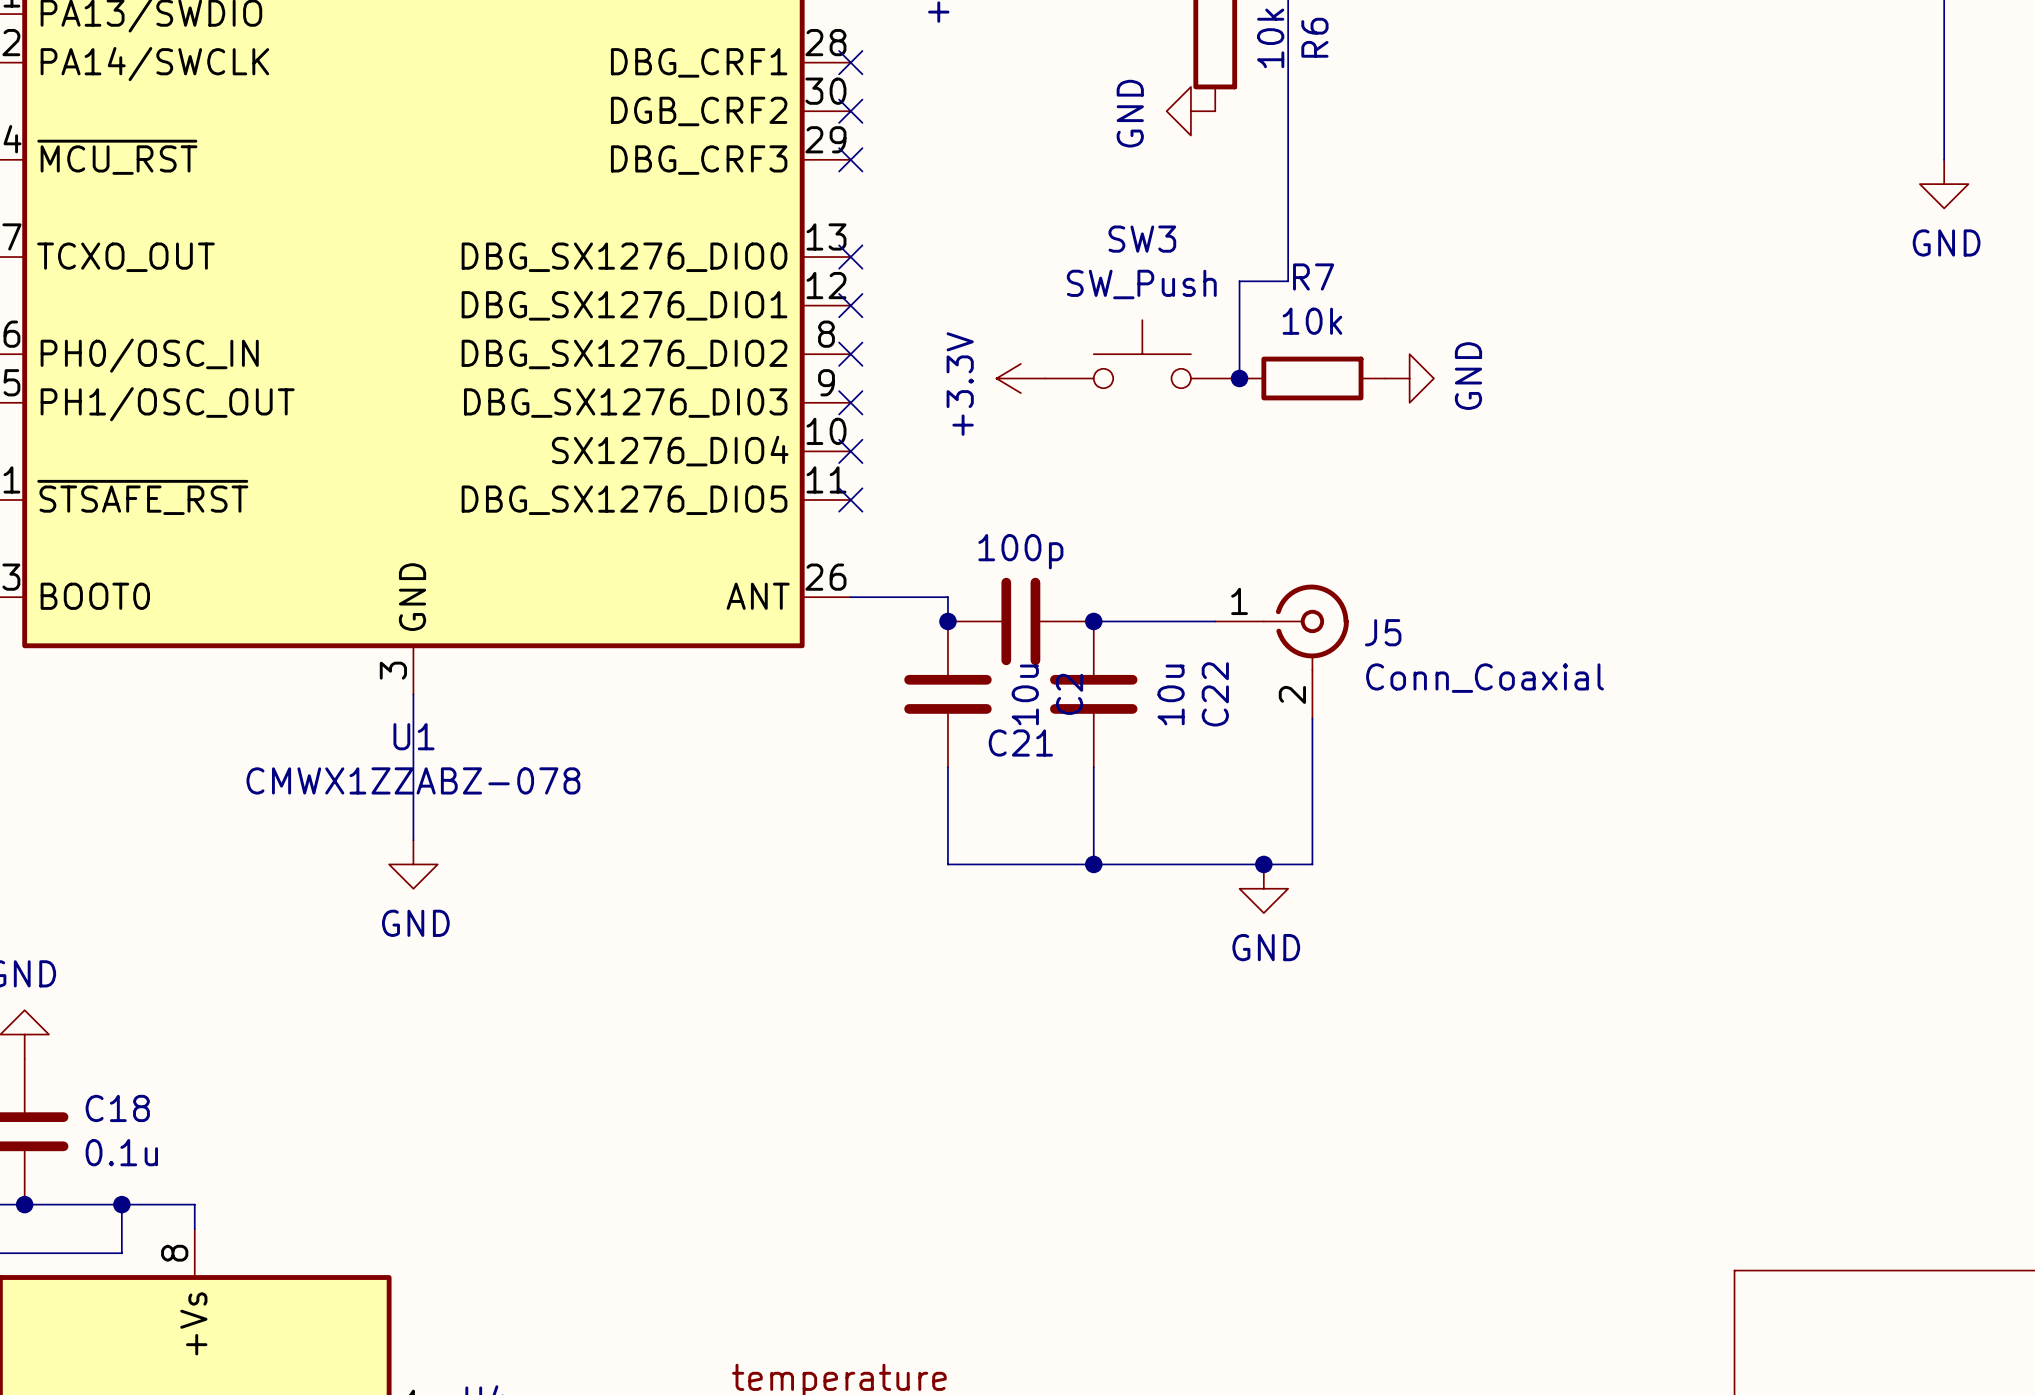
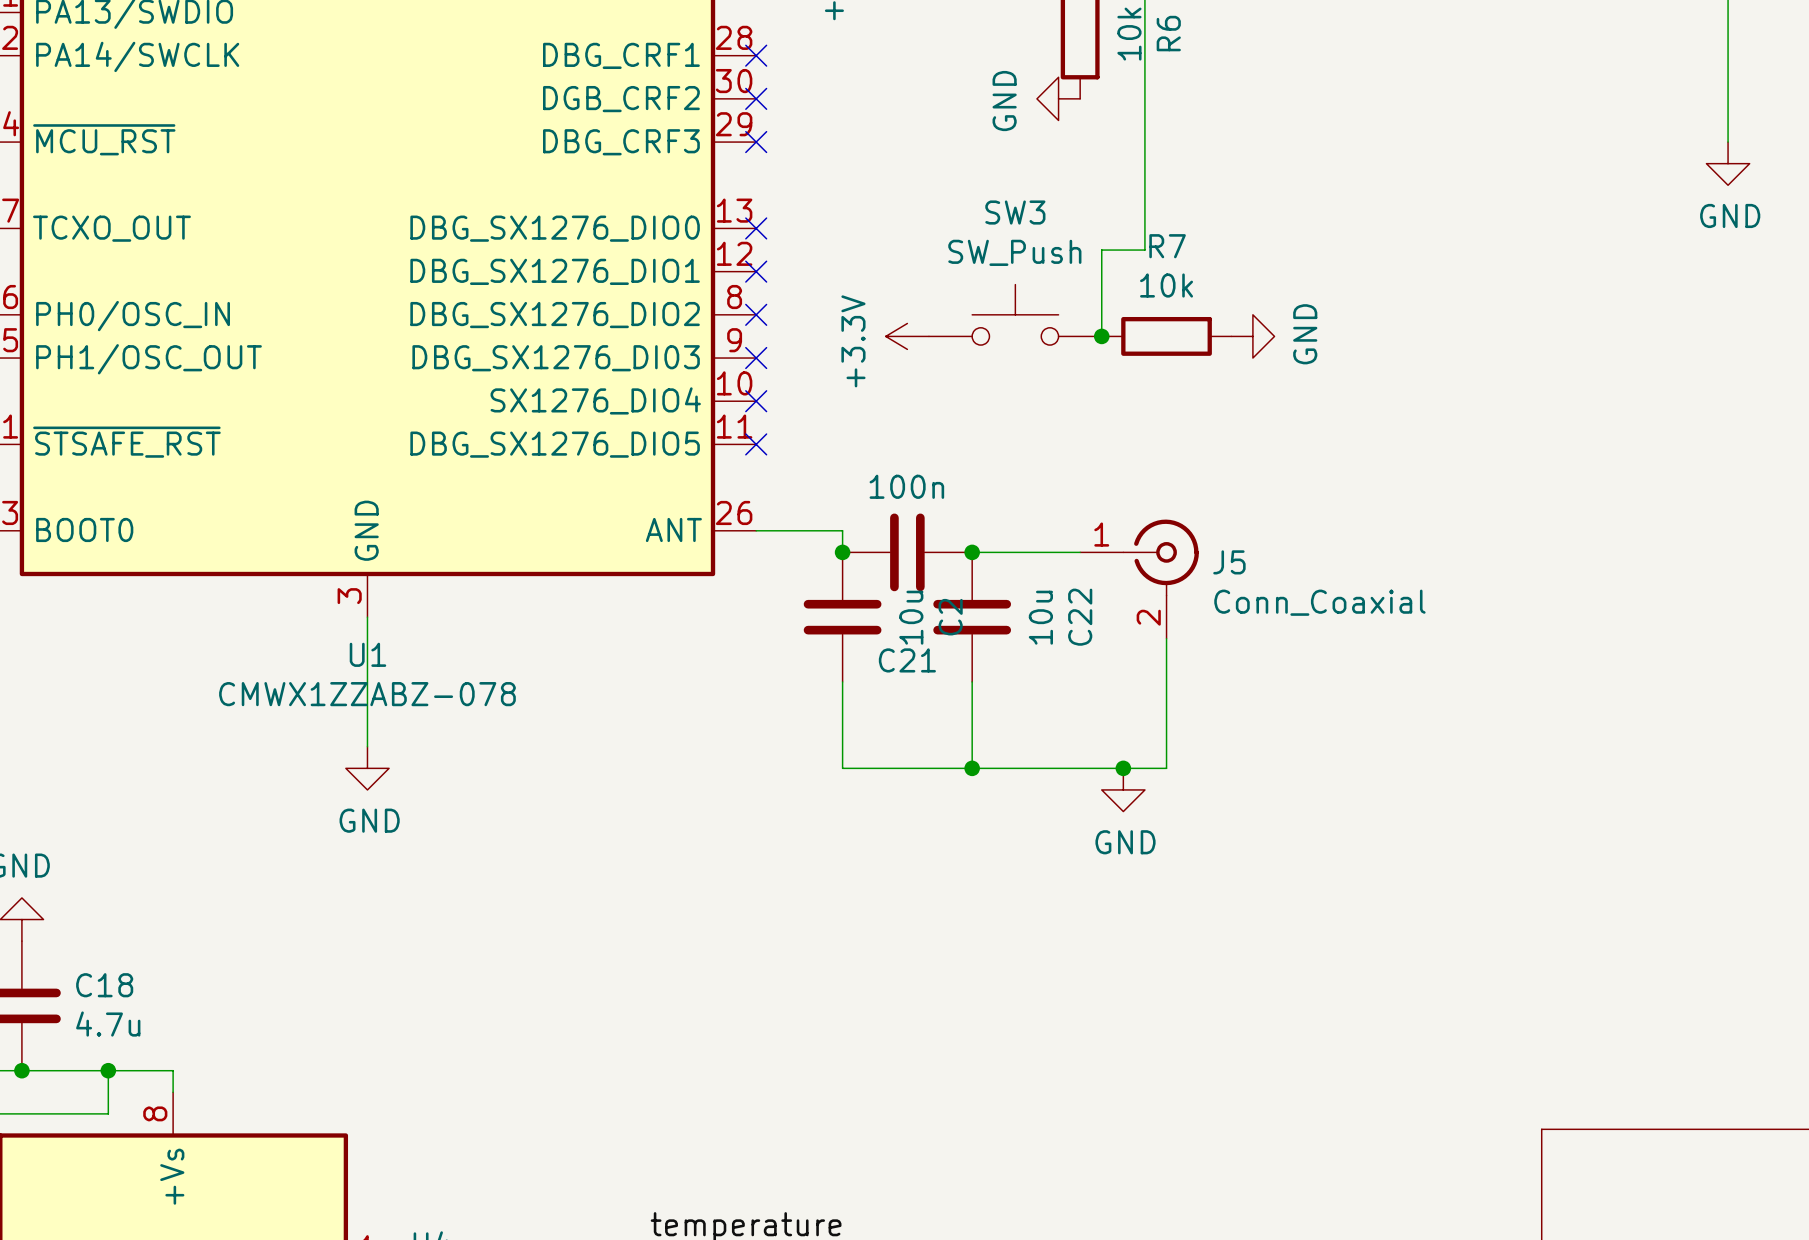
C21 value: 100p (1020, 551) -> 100n (906, 486)
C18 value: 0.1u (121, 1152) -> 4.7u (108, 1024)

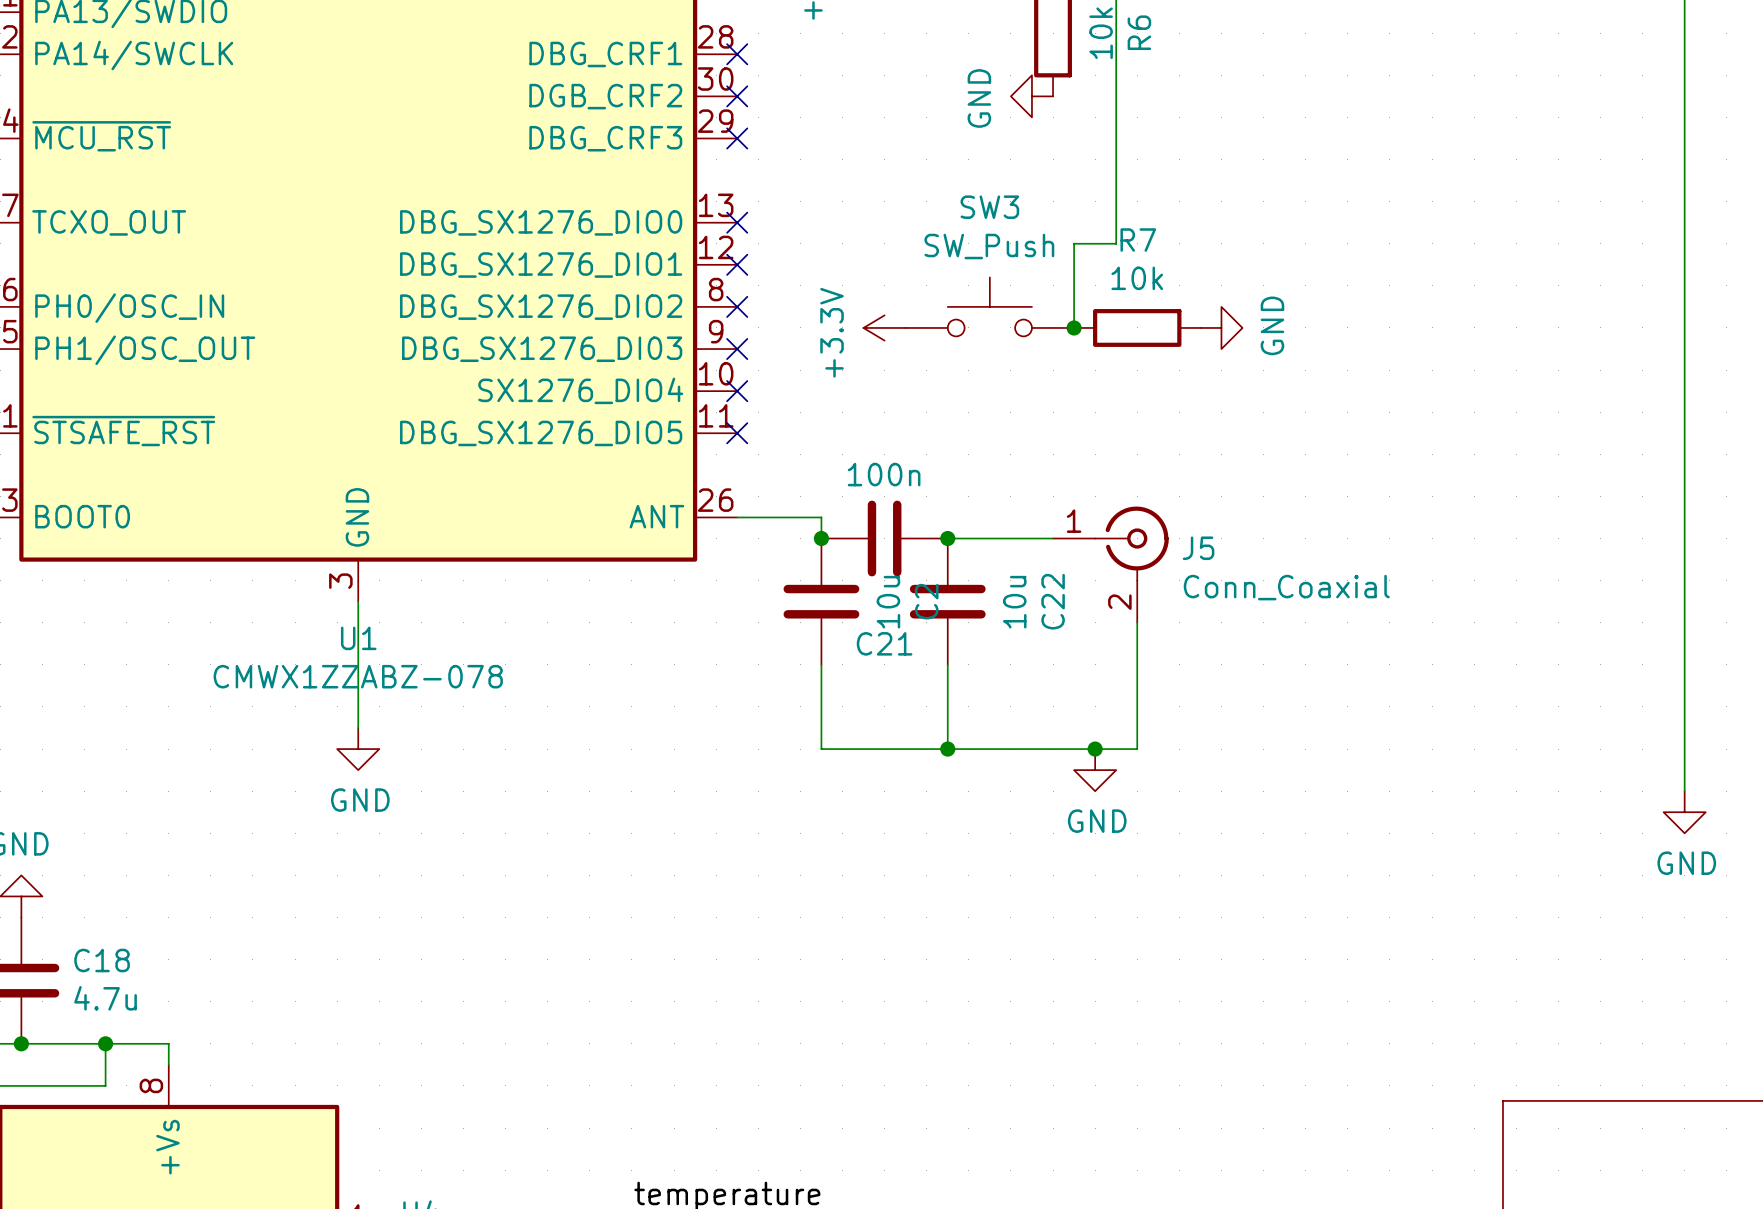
wire: none -> (1684, 138) (1684, 791)
power symbol: GND (1728, 163) -> none
power symbol: none -> GND (1684, 812)

